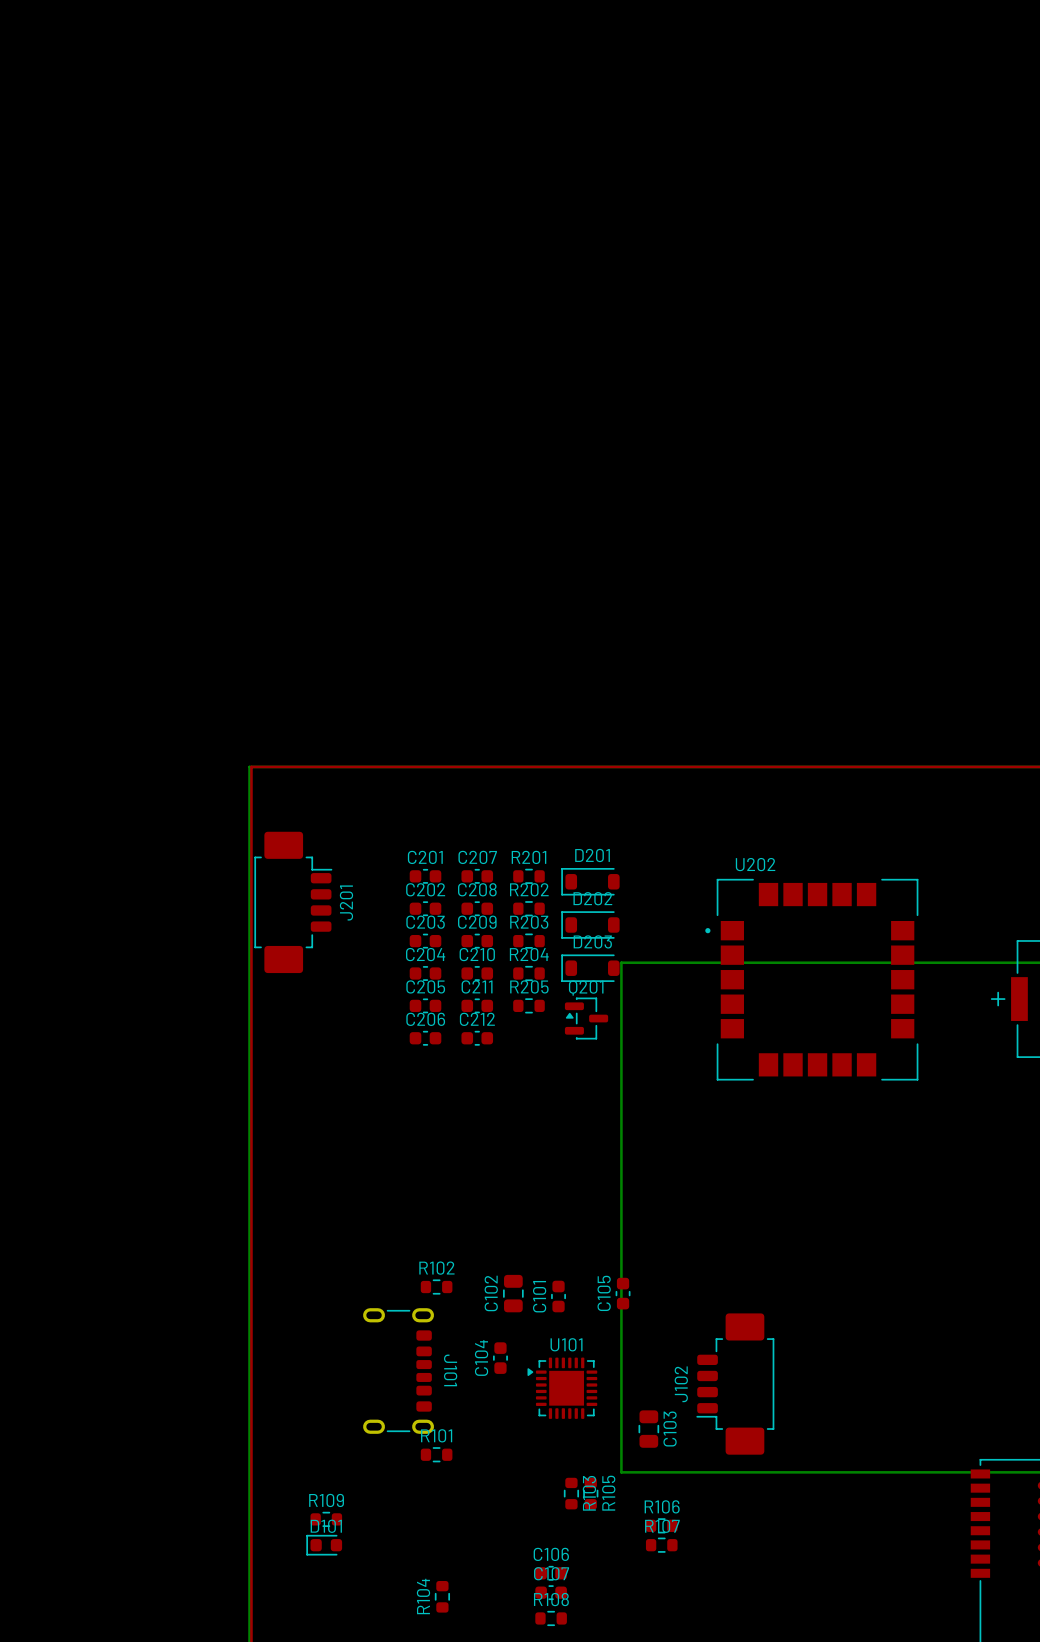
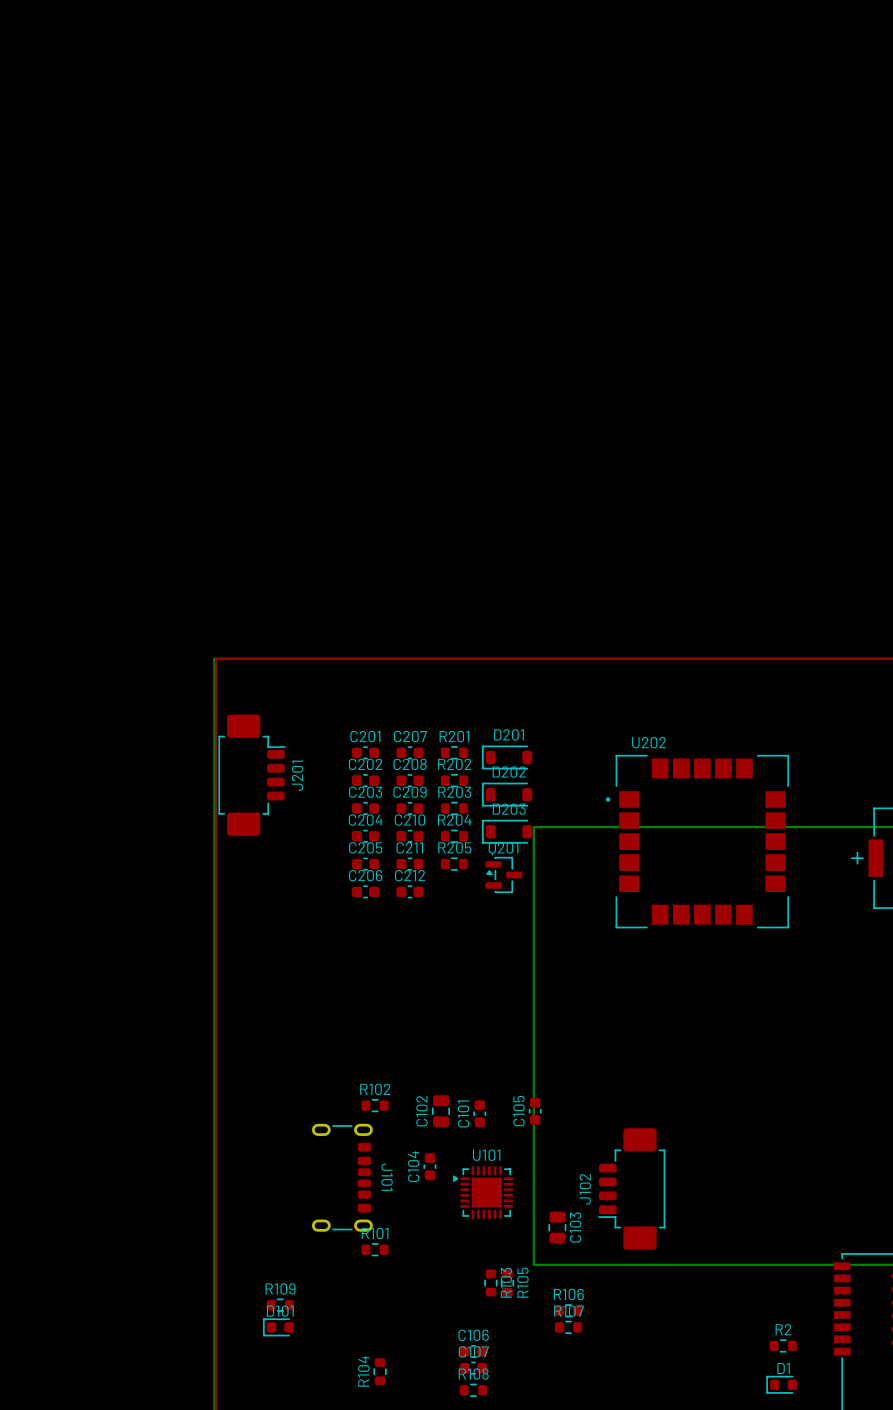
R2: none -> (783, 1346)
D1: none -> (781, 1384)

